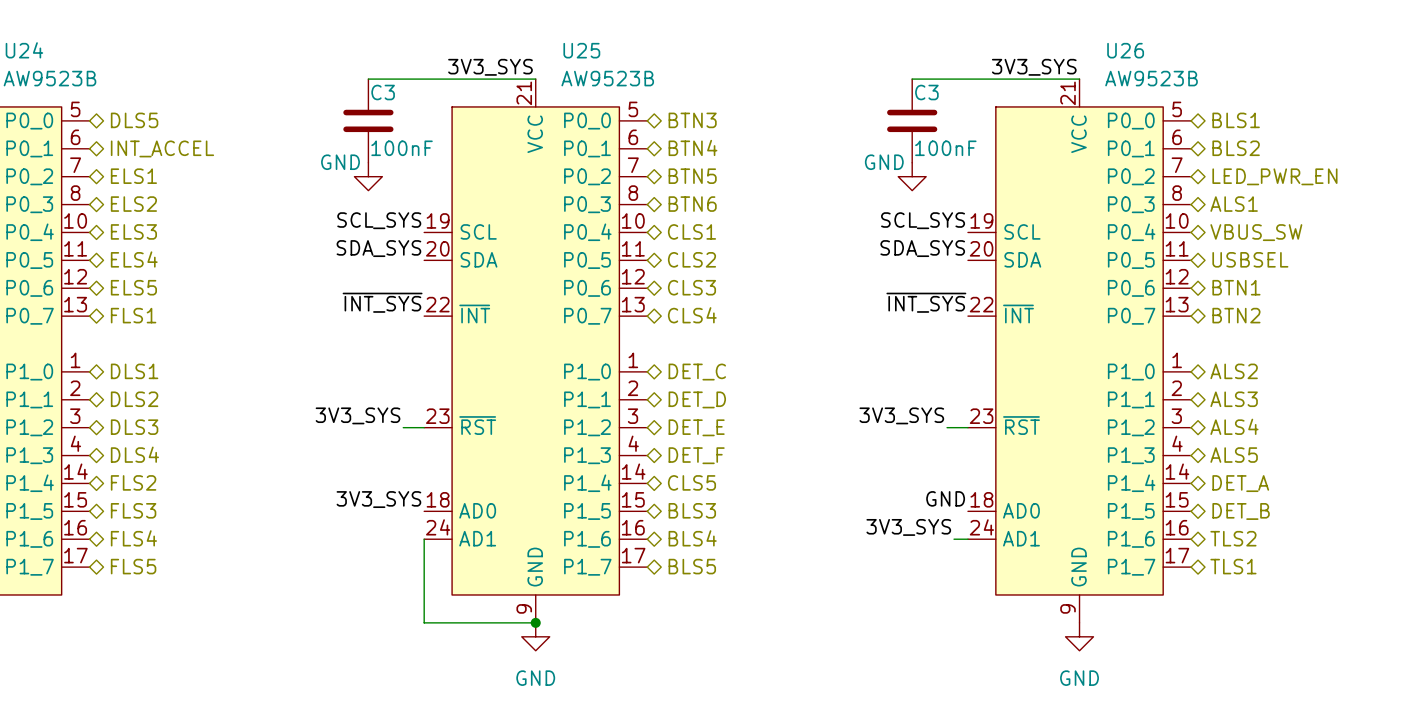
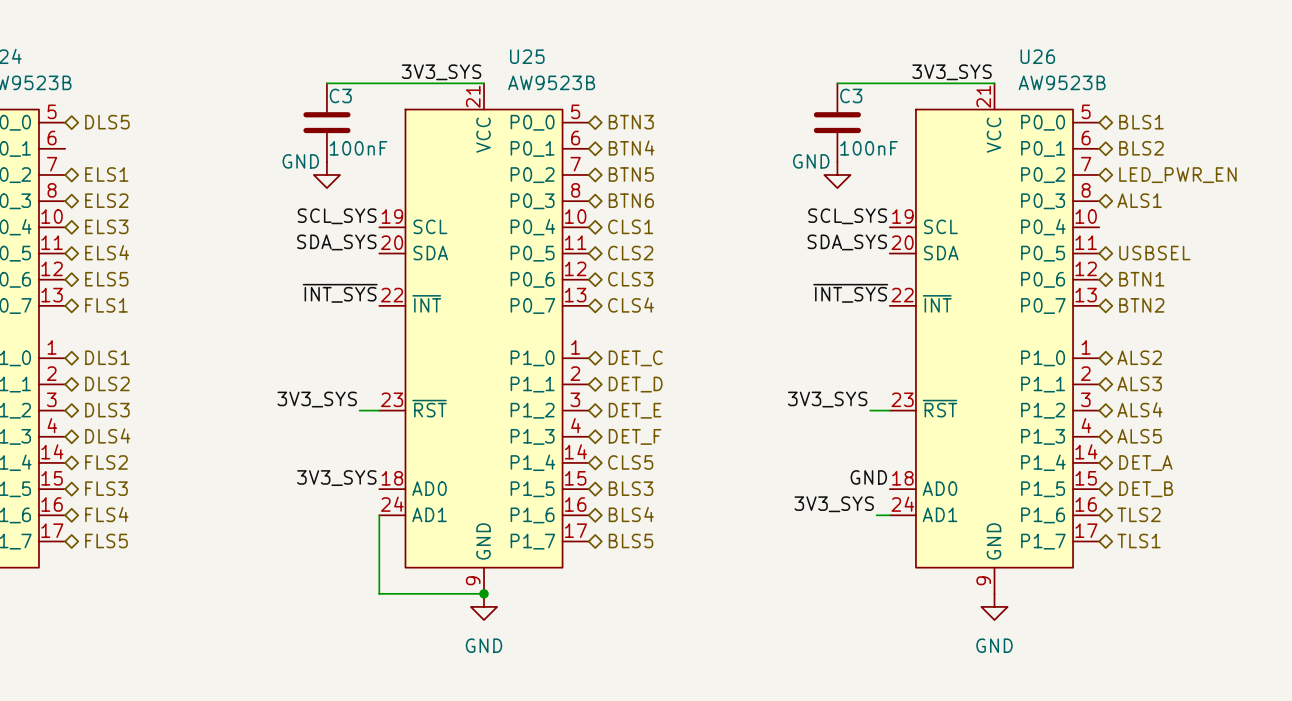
hierarchical label: INT_ACCEL (162, 148) -> none
hierarchical label: VBUS_SW (1256, 232) -> none

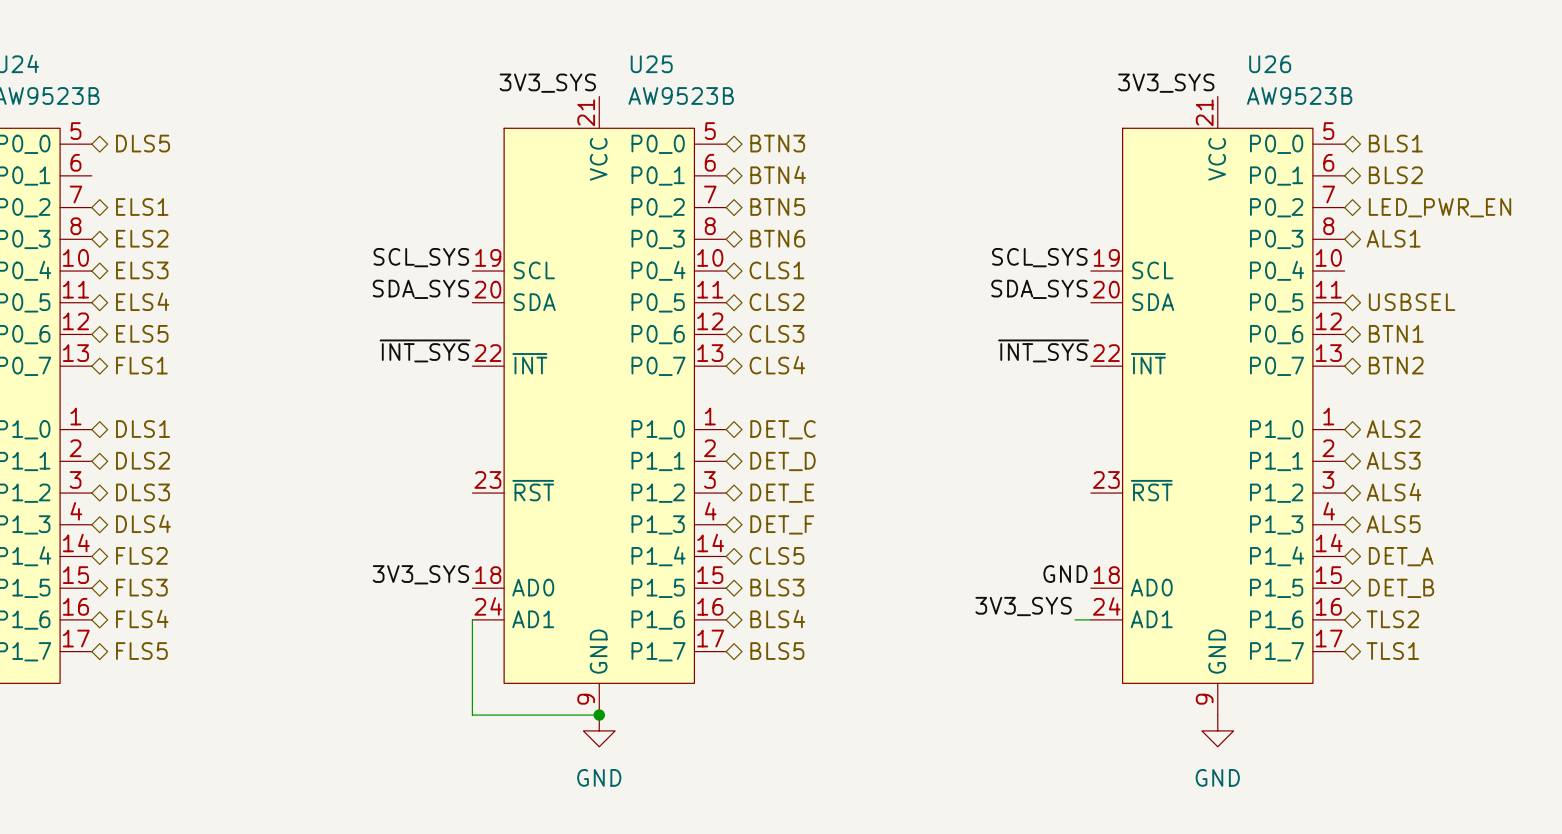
wire: (326, 83) (484, 83) -> none
wire: (837, 83) (994, 83) -> none
C3: 100nF (326, 122) -> none
C3: 100nF (837, 122) -> none
power symbol: GND (326, 174) -> none
power symbol: GND (837, 174) -> none
label: 3V3_SYS (317, 399) -> none
label: 3V3_SYS (827, 399) -> none
wire: (359, 410) (379, 410) -> none
wire: (870, 410) (889, 410) -> none

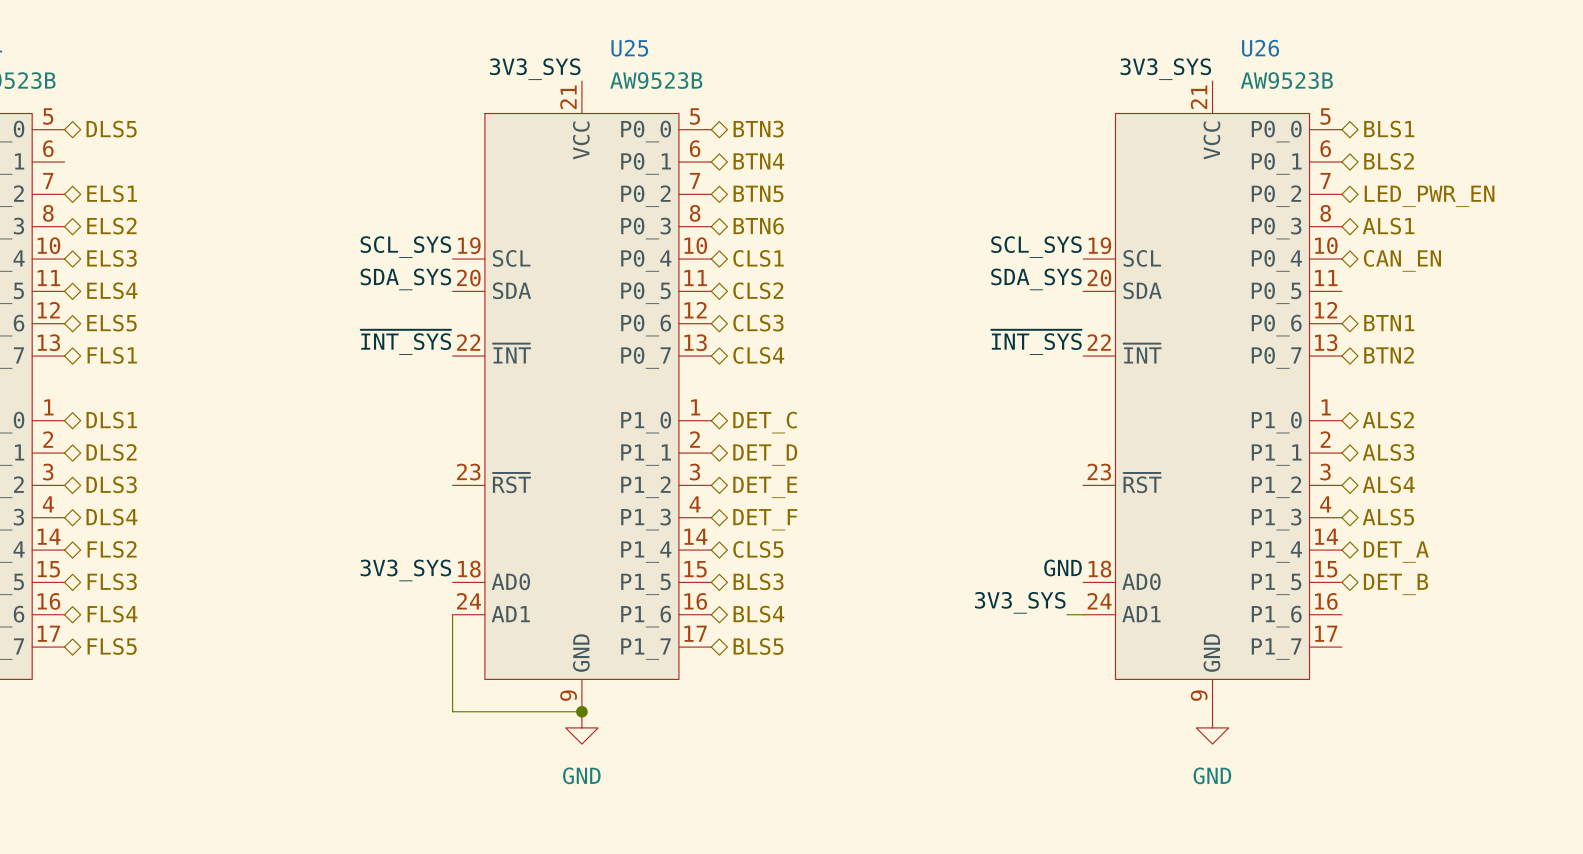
hierarchical label: none -> CAN_EN (1402, 260)
hierarchical label: USBSEL (1412, 302) -> none
hierarchical label: TLS2 (1392, 619) -> none
hierarchical label: TLS1 (1392, 651) -> none

